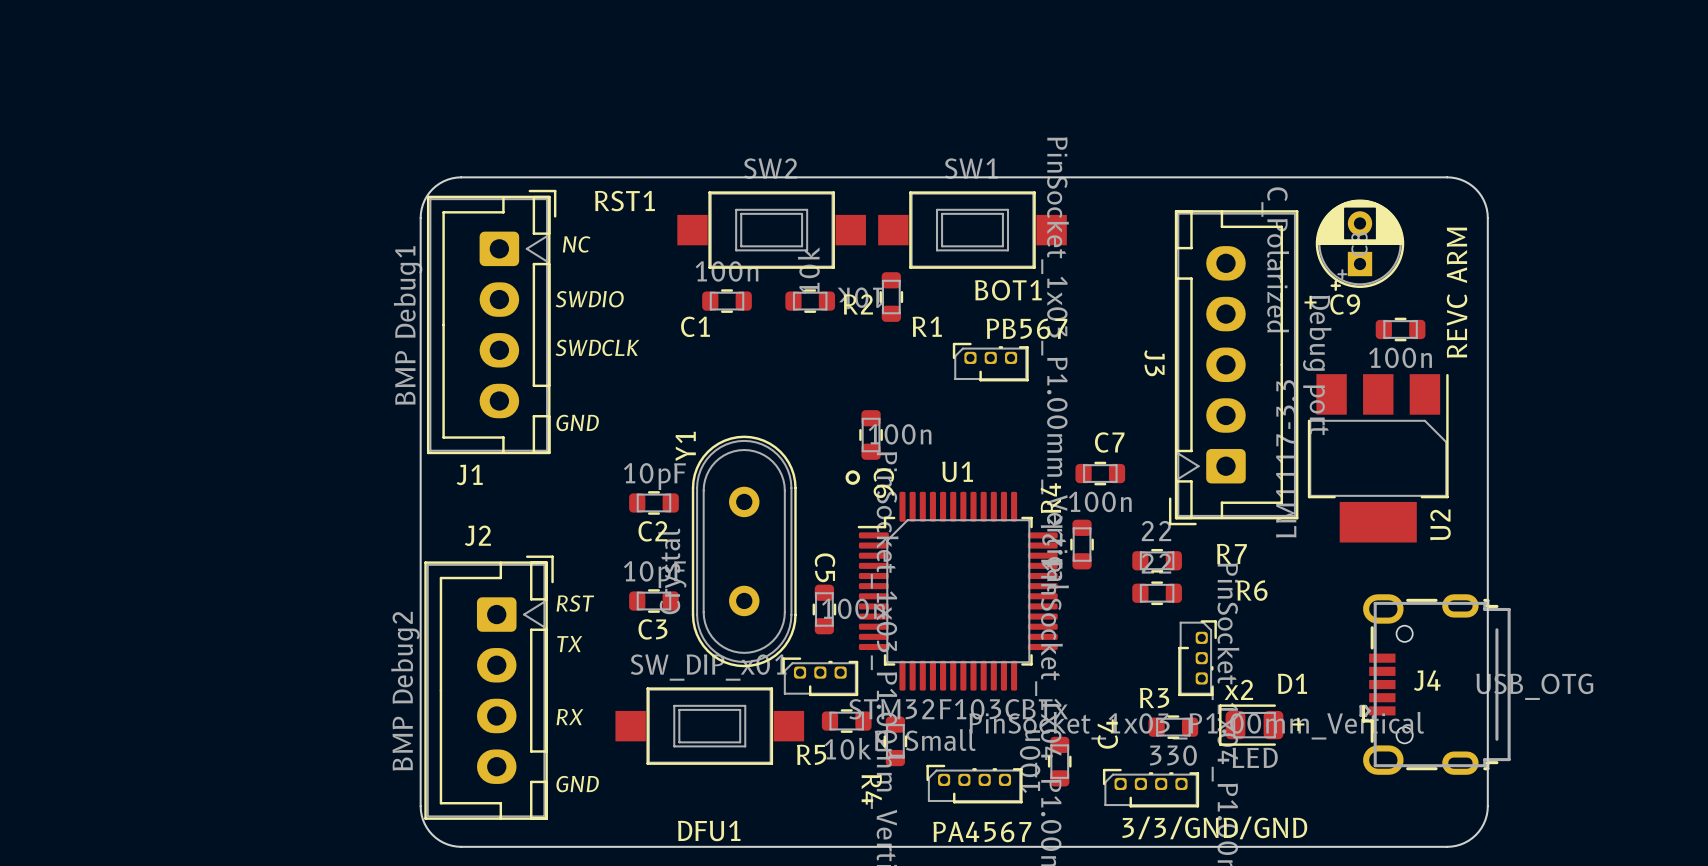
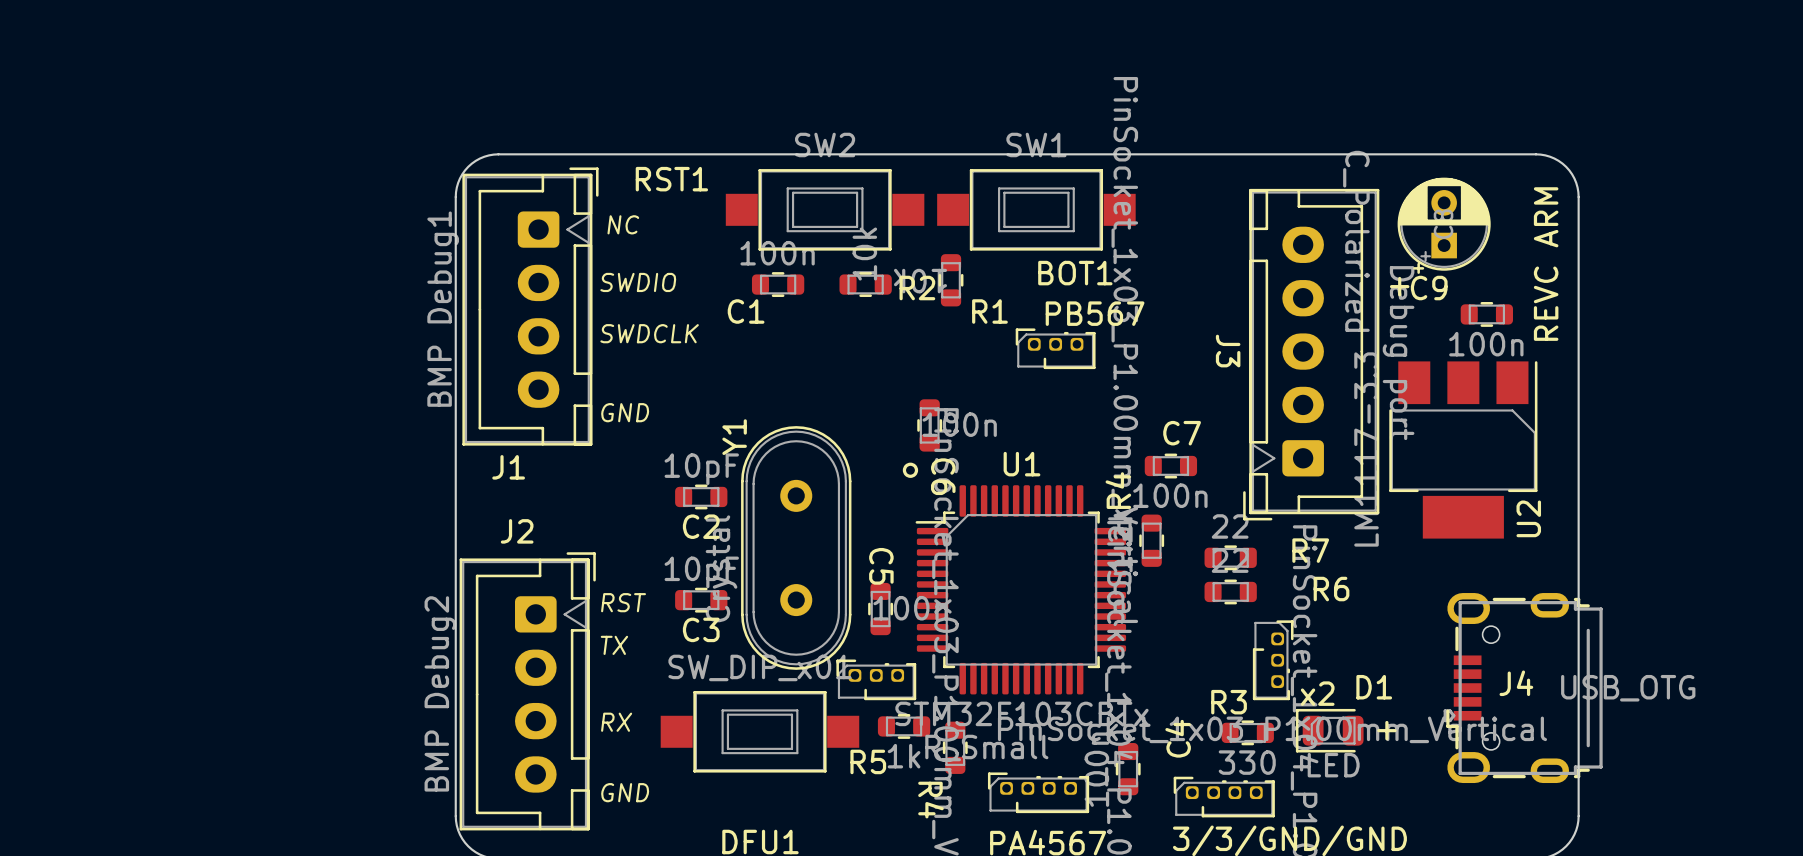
R5 value: 10k (848, 748) -> 1k (904, 756)

